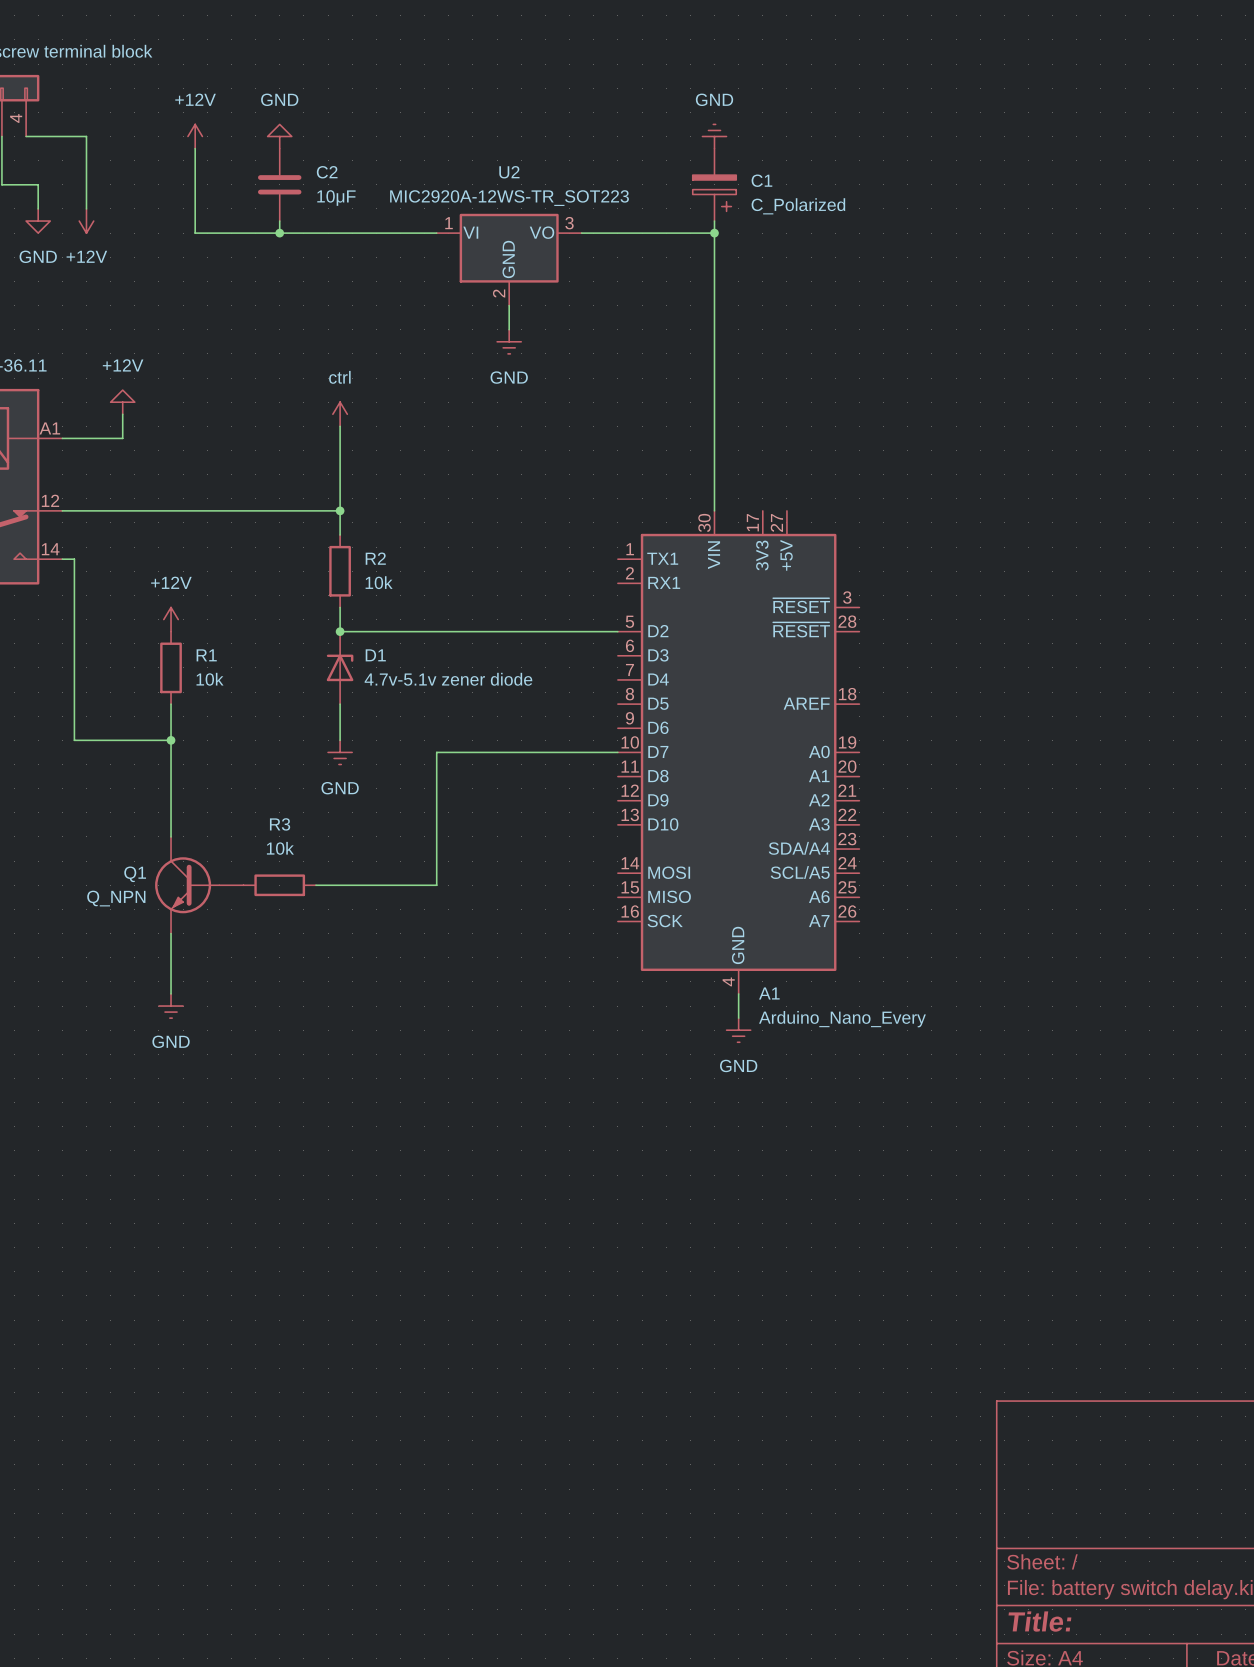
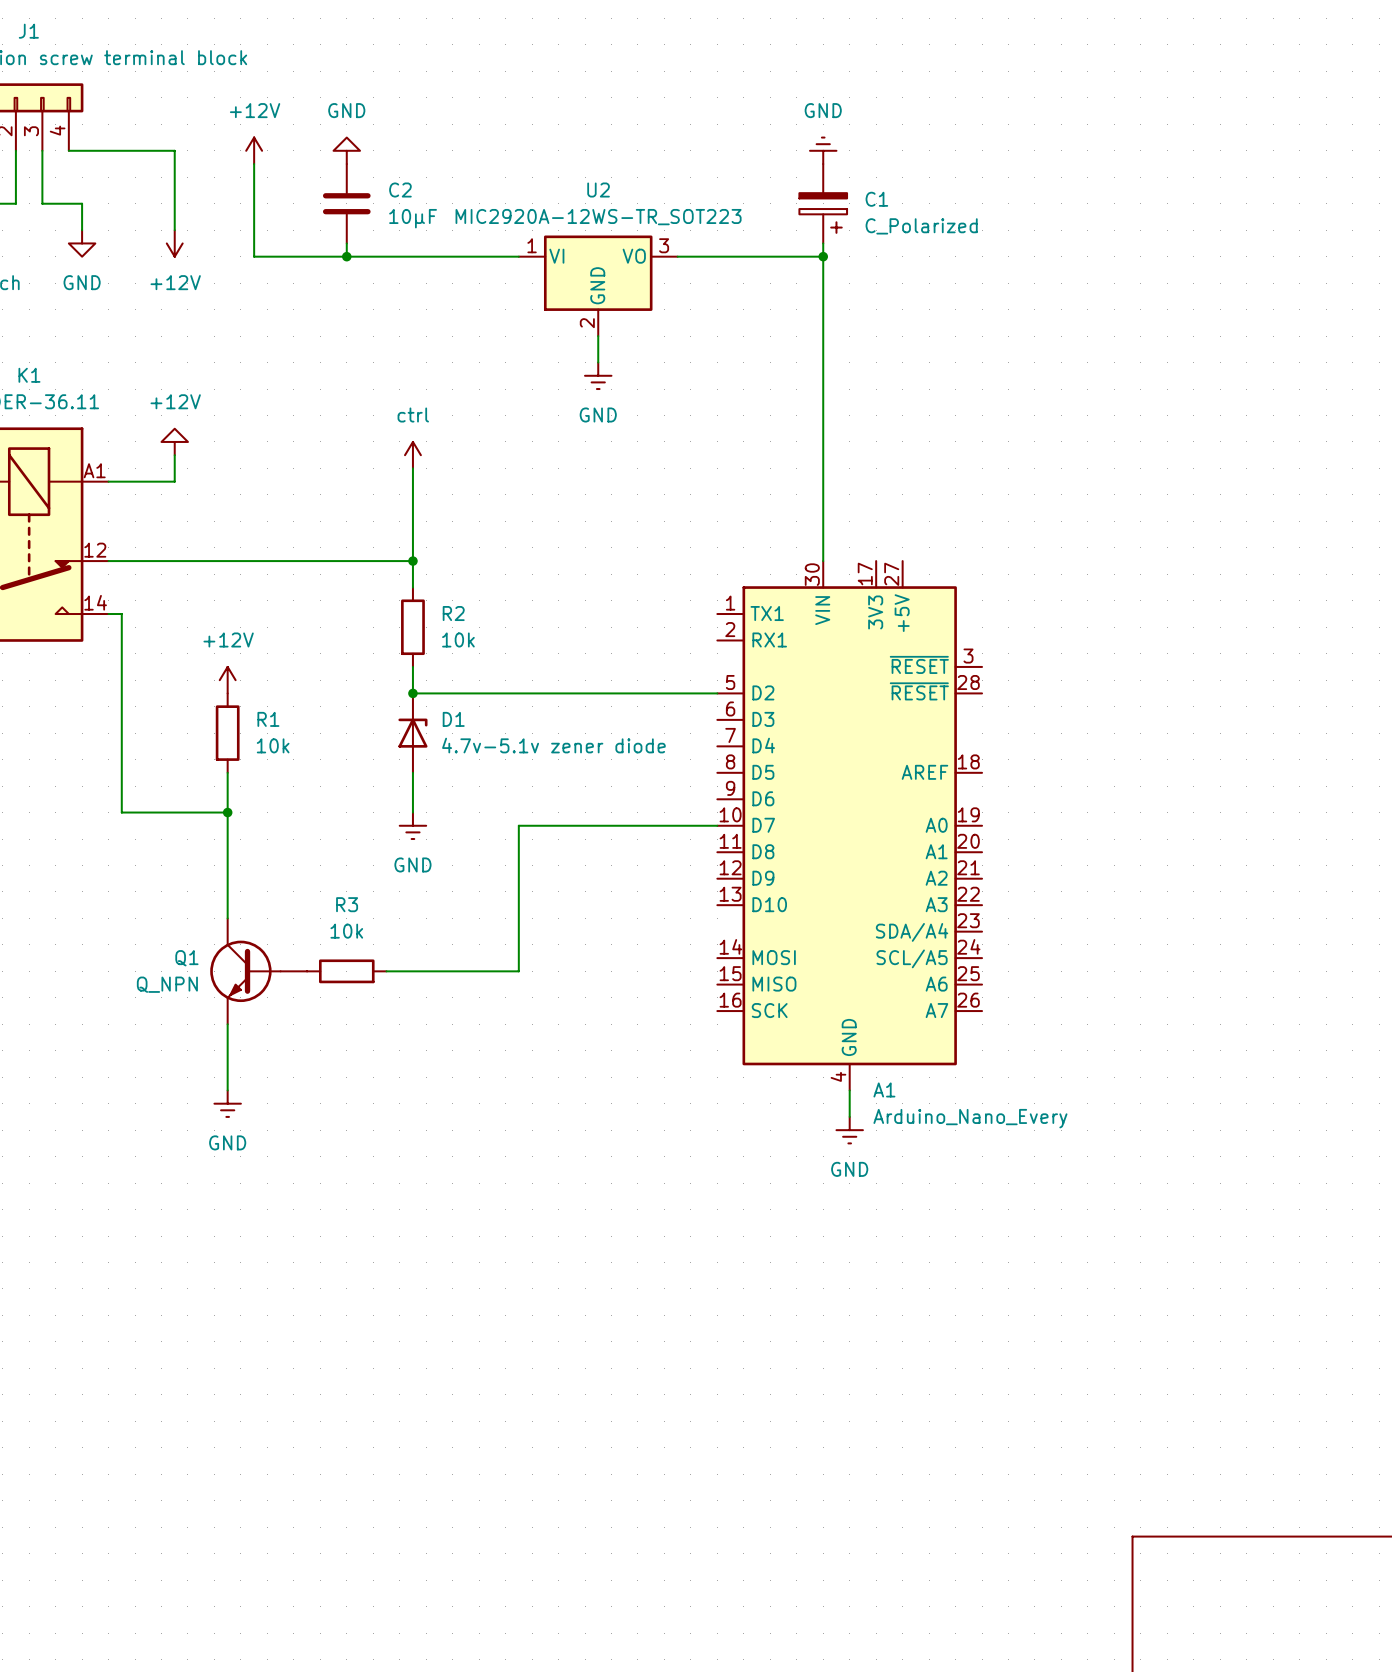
wire: (86, 136) (86, 208) -> (135, 150) (174, 150) (174, 230)
power symbol position: +12V (86, 221) -> +12V (174, 243)

